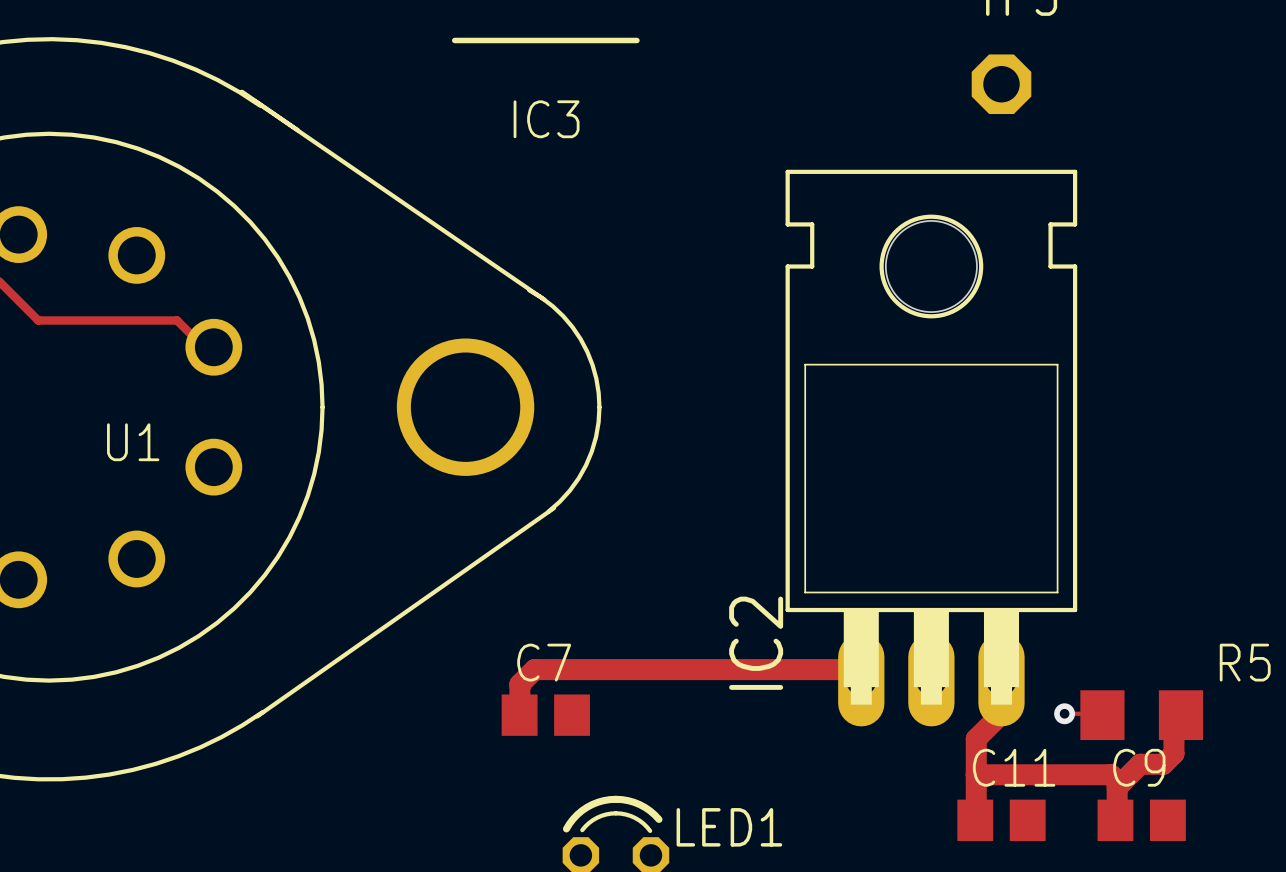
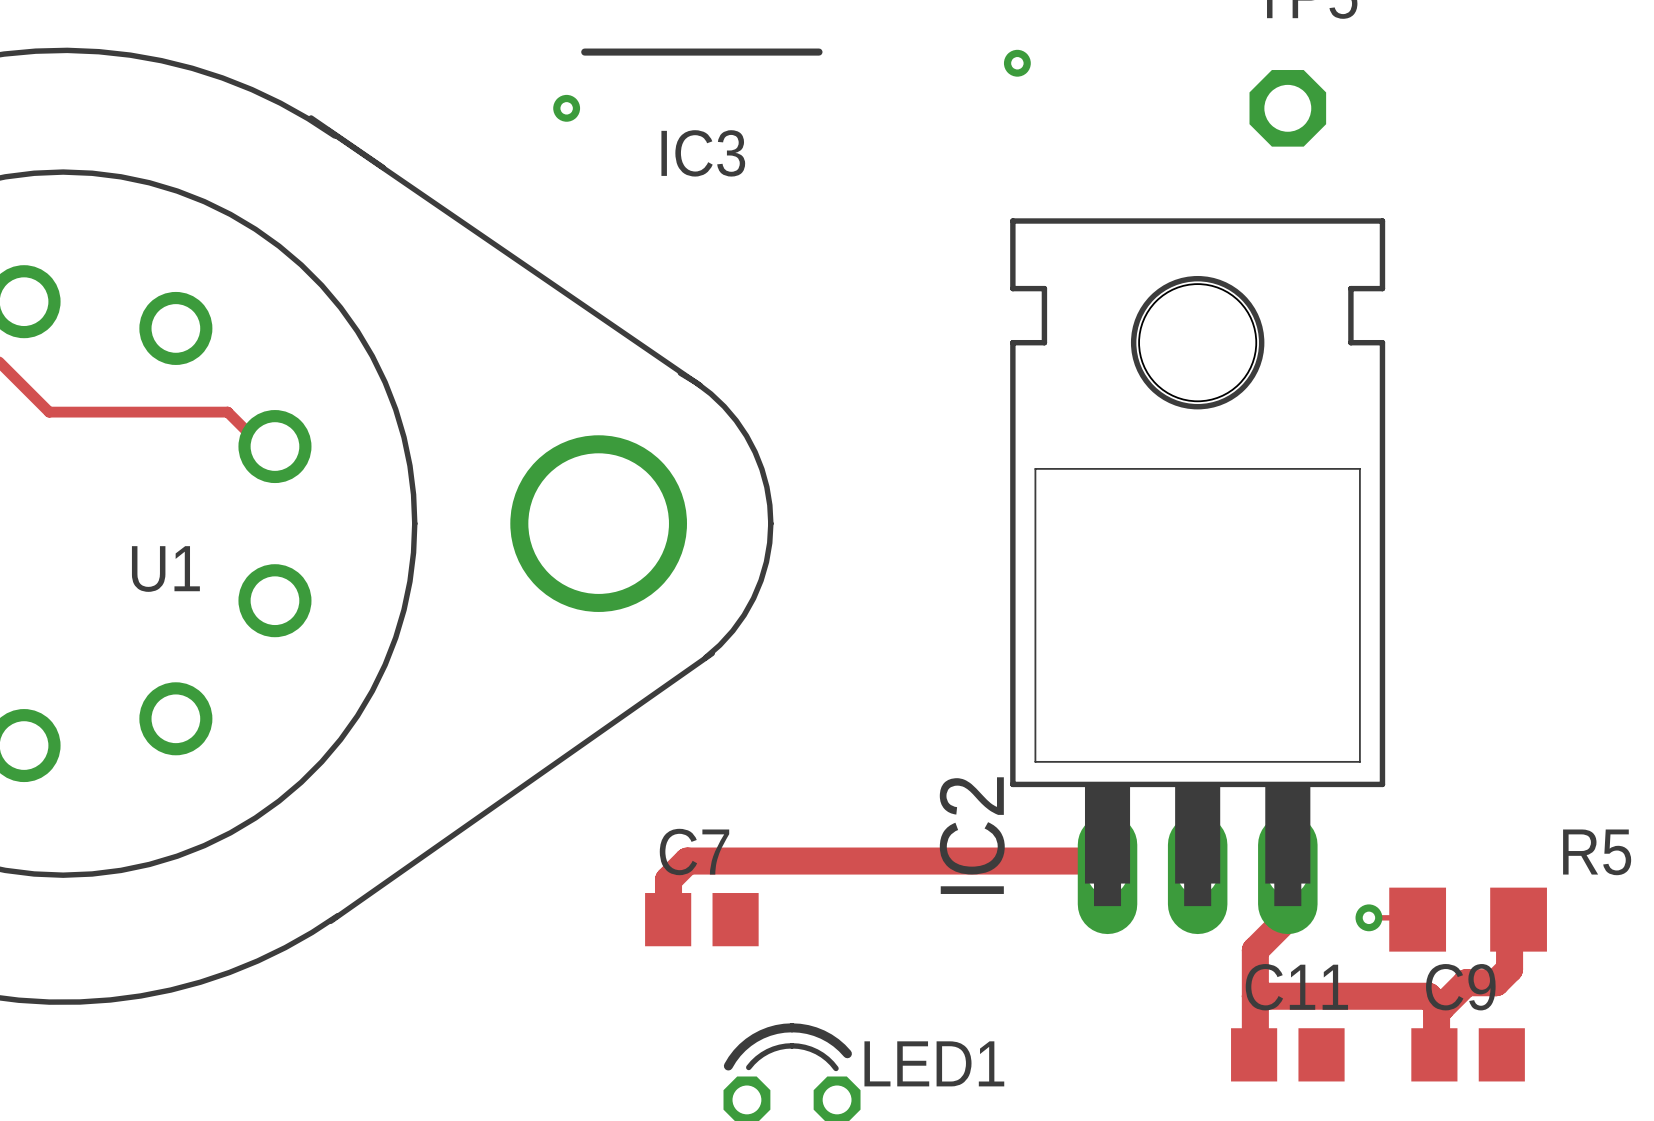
via: none -> (1017, 63)
via: none -> (566, 108)

